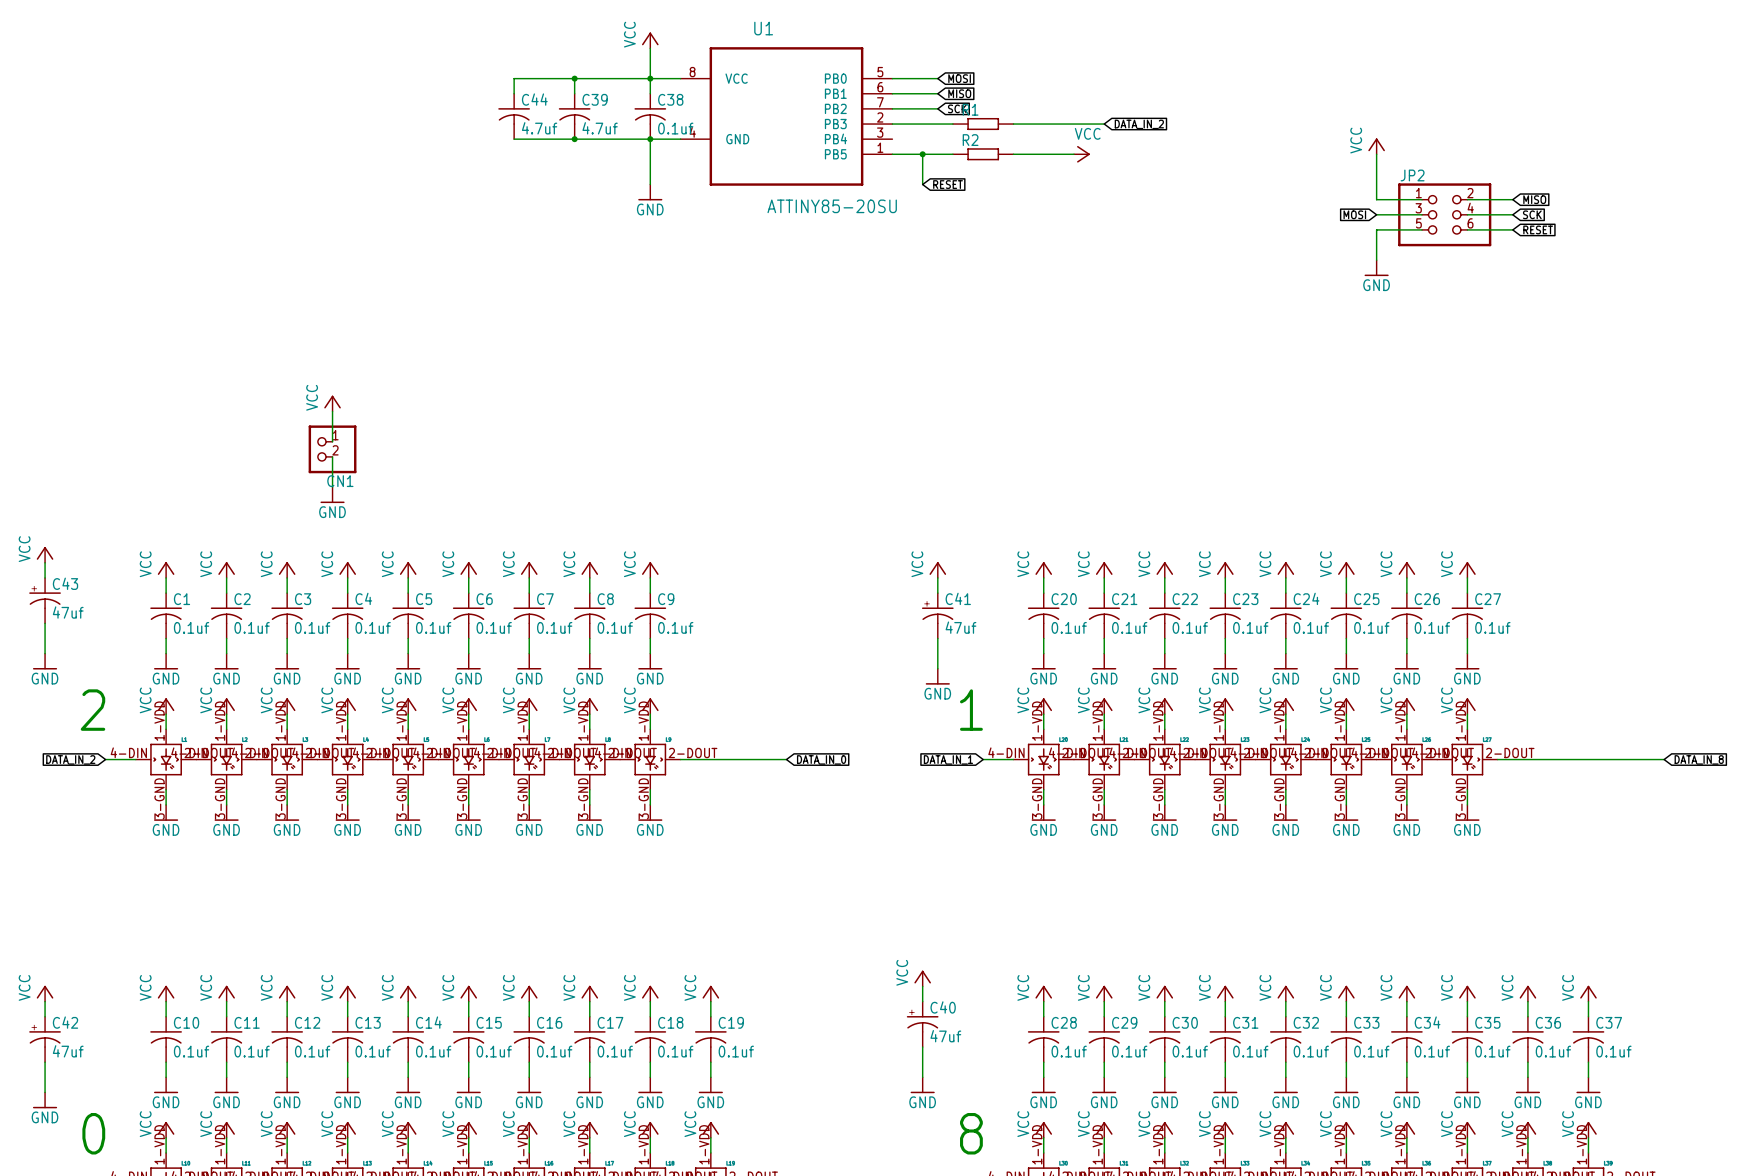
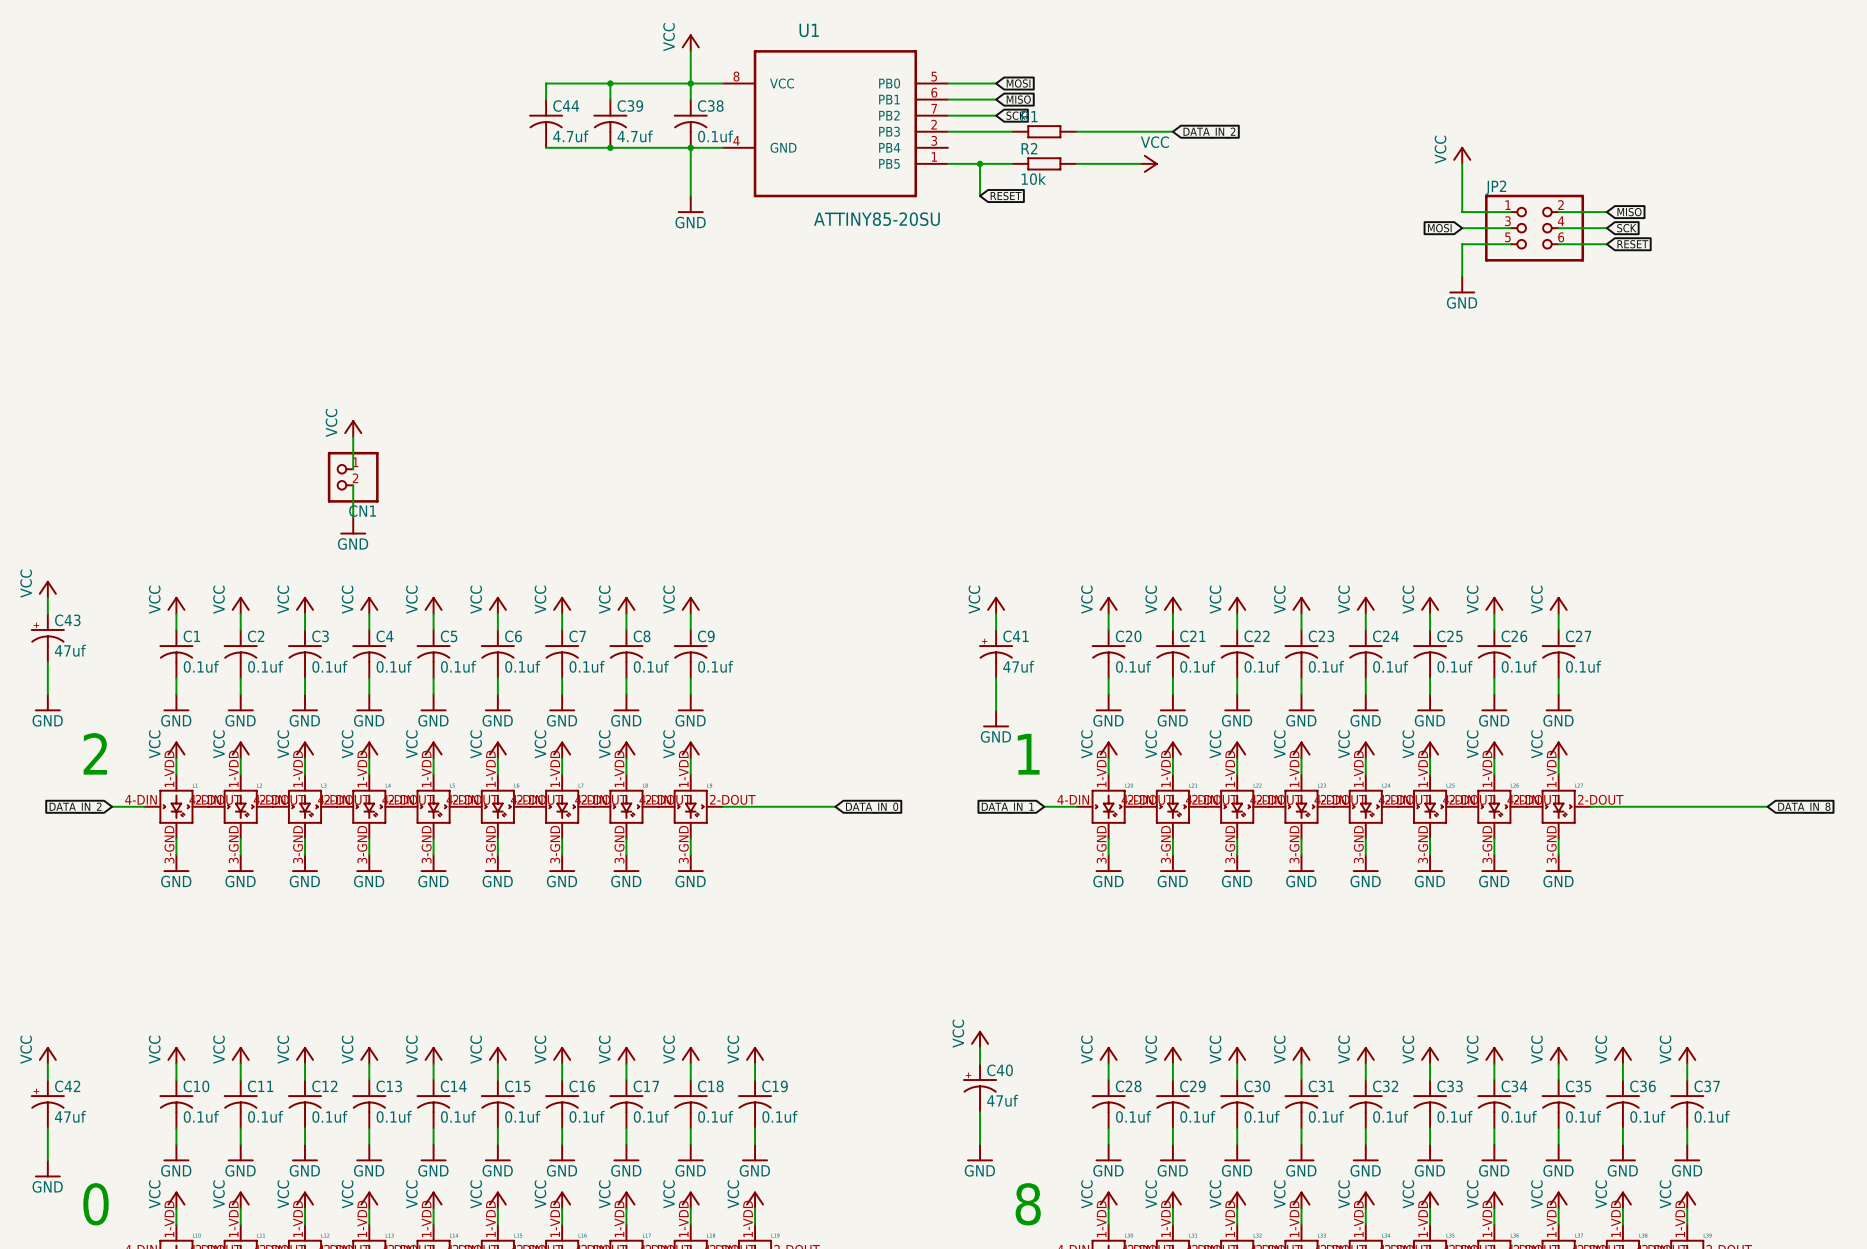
R2 value: none -> 10k (1033, 179)

